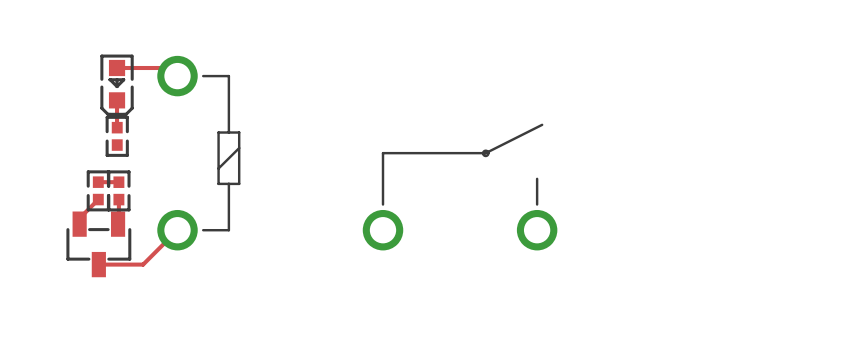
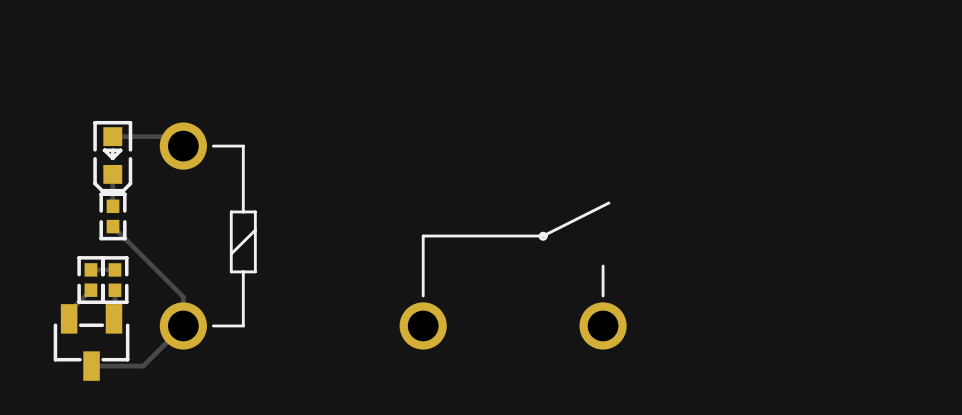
track: none -> (113, 226) (183, 296) (183, 325)

